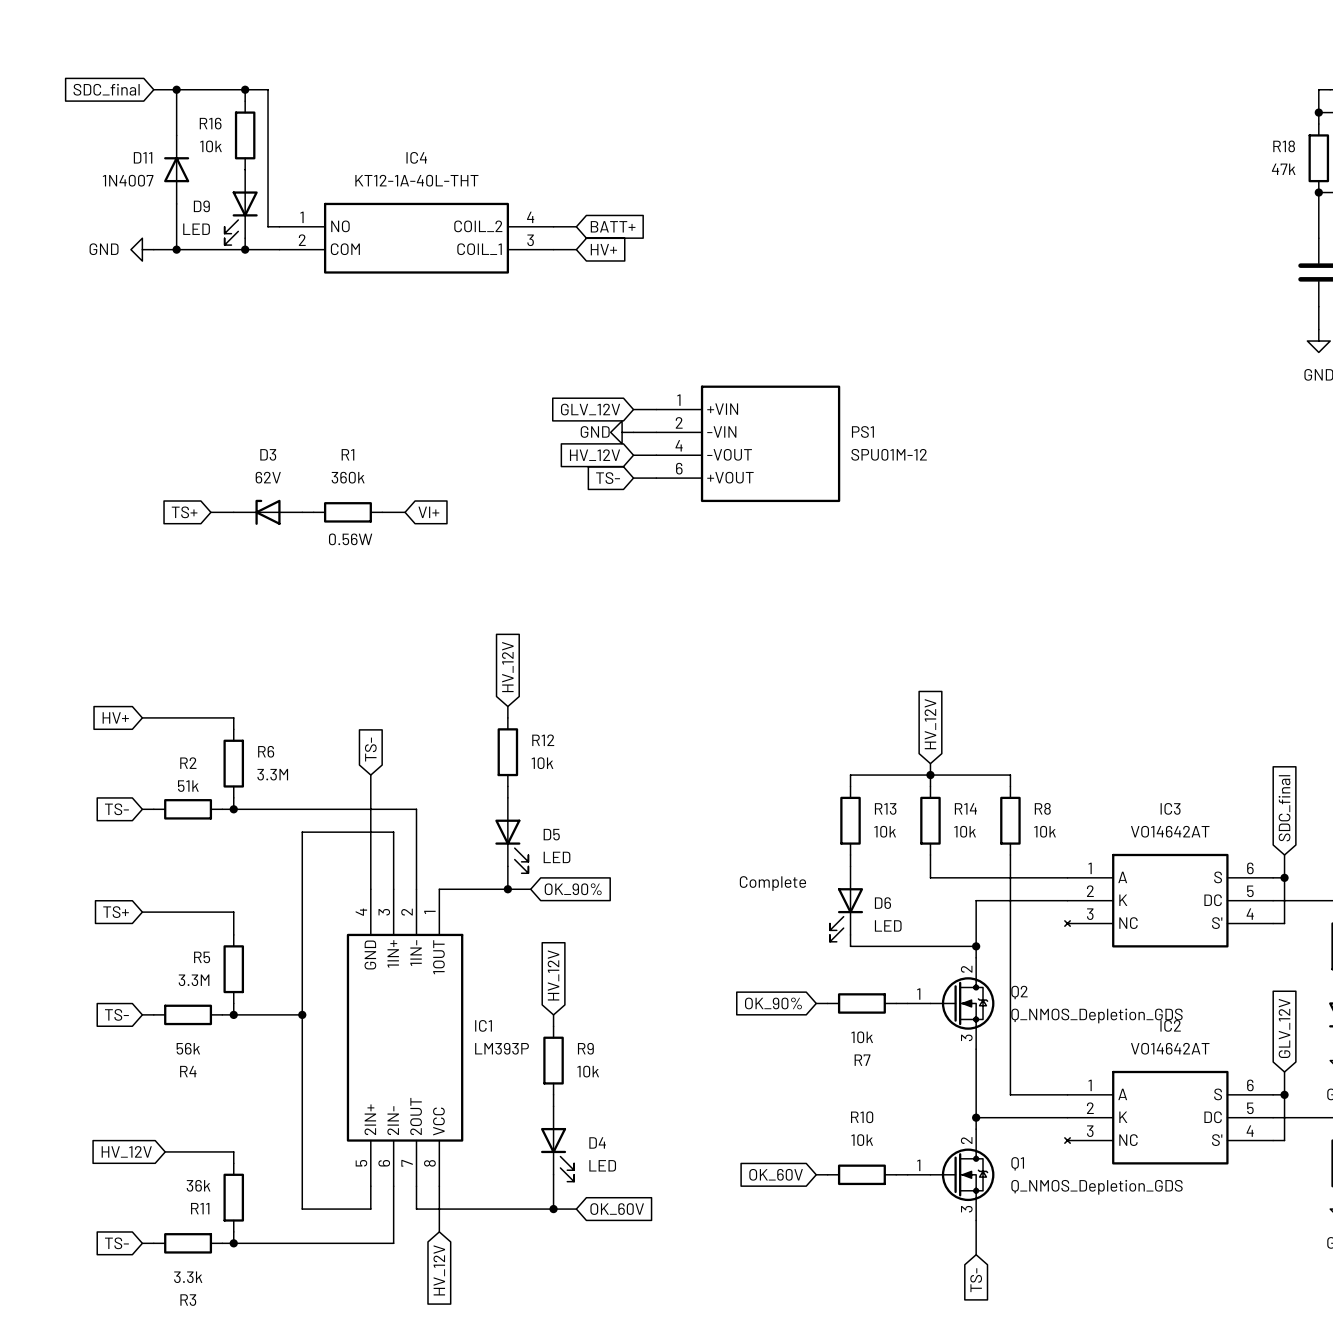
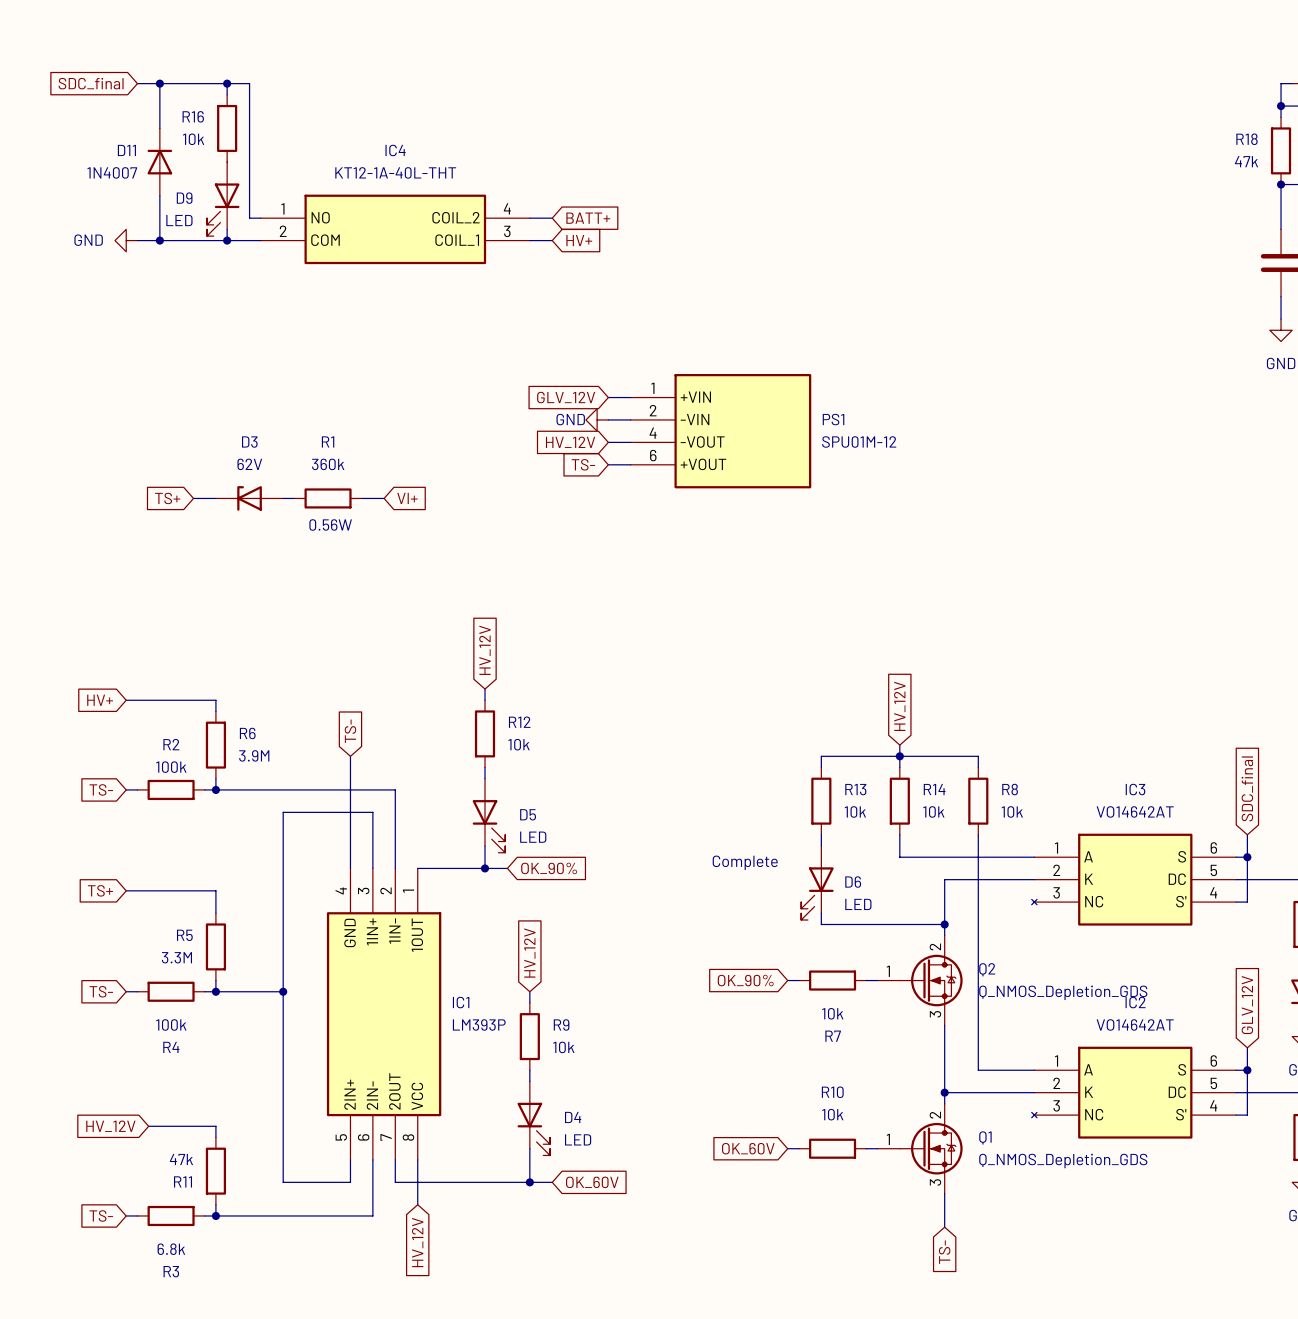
R6 value: 3.3M (272, 774) -> 3.9M (254, 755)
R2 value: 51k (188, 786) -> 100k (171, 767)
R4 value: 56k (188, 1048) -> 100k (171, 1024)
R11 value: 36k (198, 1185) -> 47k (181, 1159)
R3 value: 3.3k (188, 1277) -> 6.8k (171, 1249)

